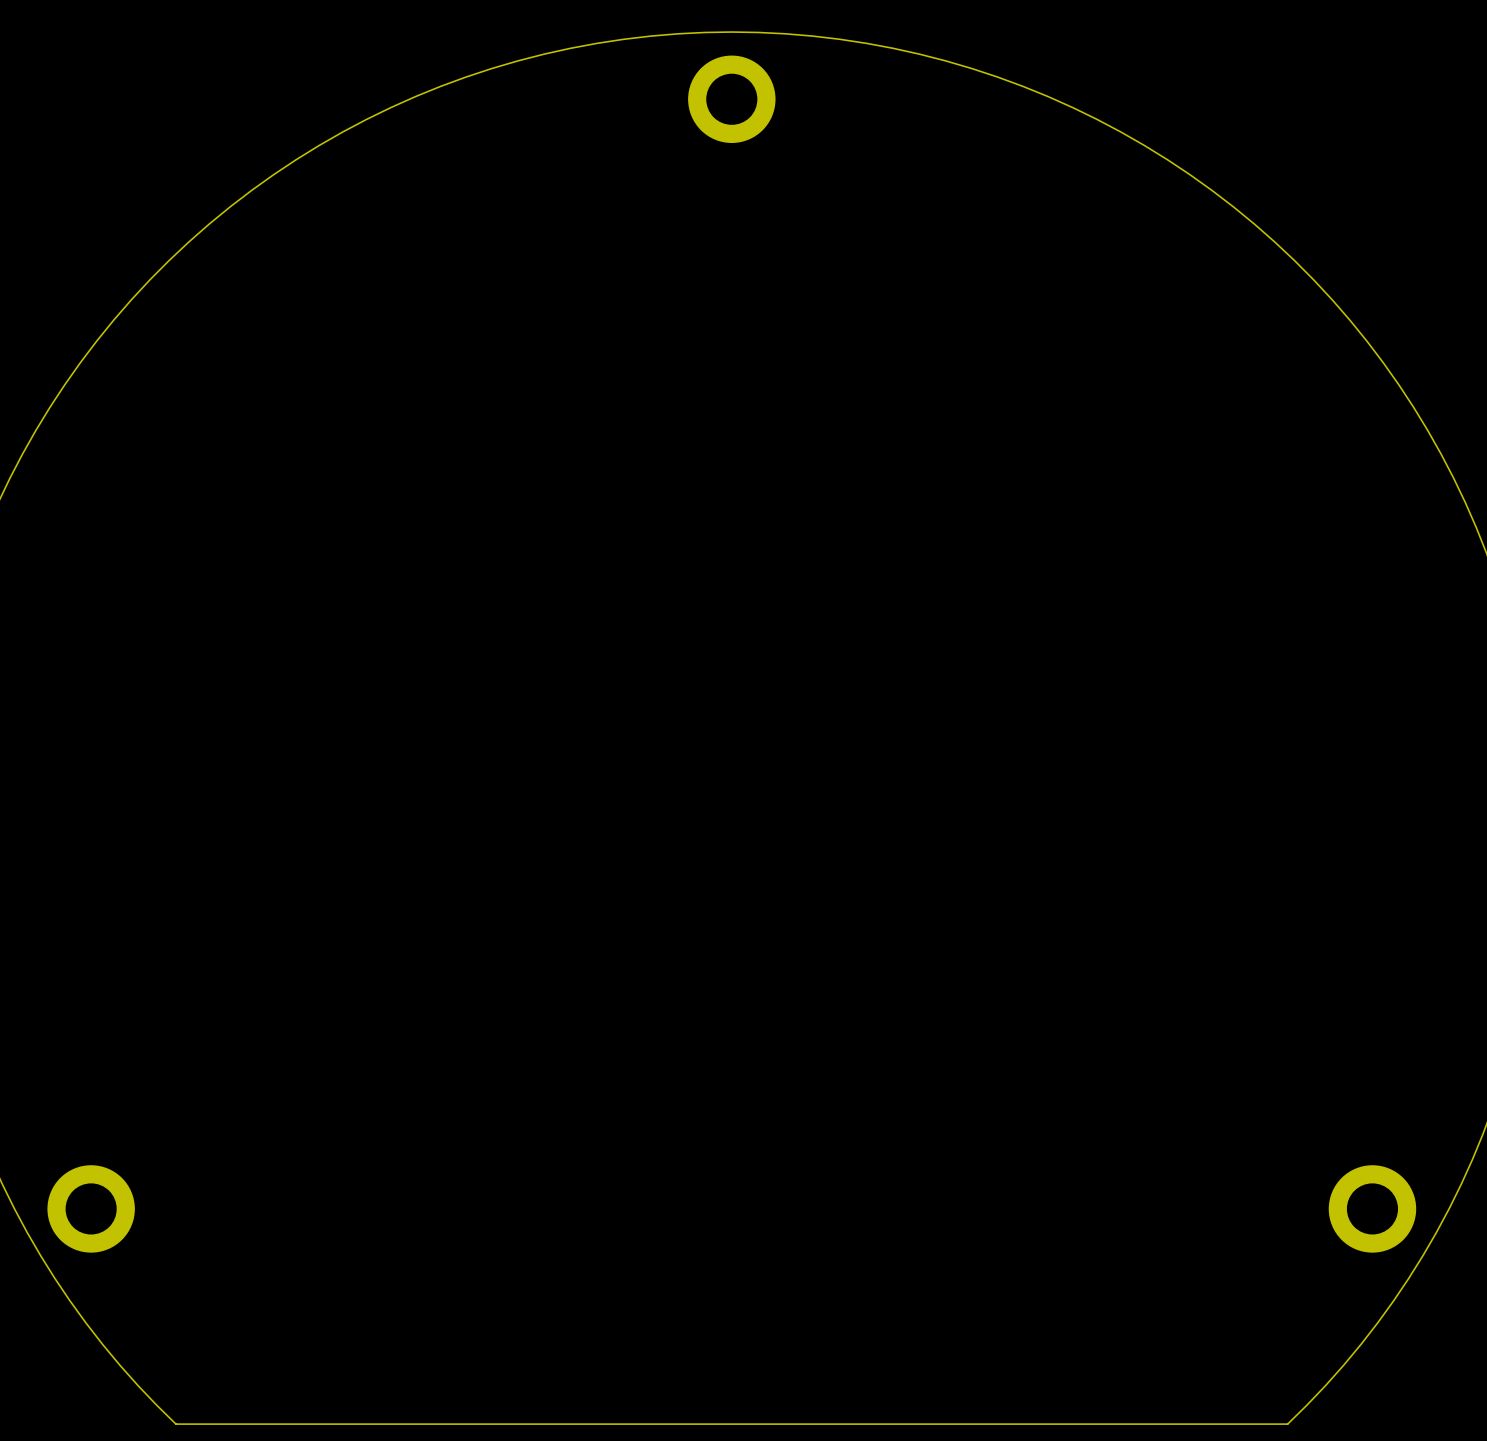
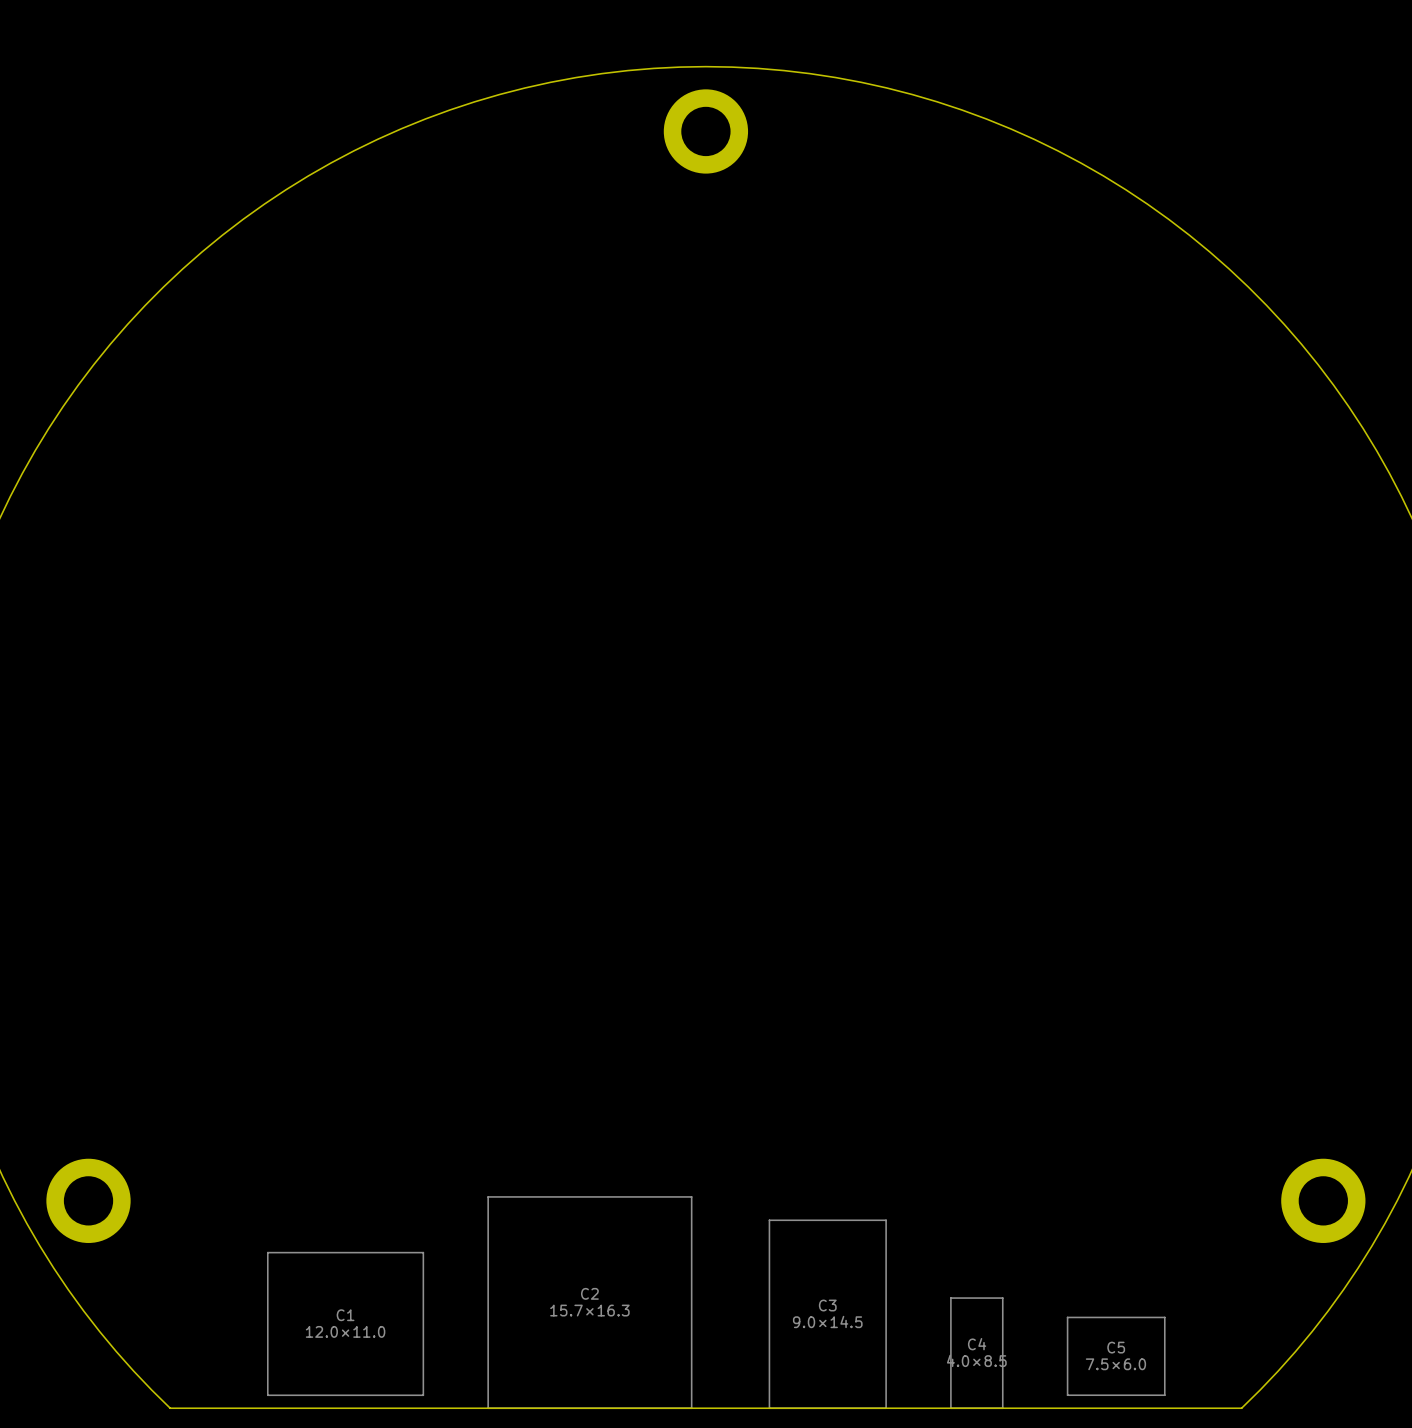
line: none -> (488, 1196) (691, 1196) (691, 1408) (488, 1408) (488, 1196)
line: none -> (769, 1220) (886, 1220) (886, 1408) (769, 1408) (769, 1220)
line: none -> (267, 1252) (423, 1252) (423, 1395) (267, 1395) (267, 1252)
text: none -> C2 (589, 1293)
line: none -> (950, 1298) (1002, 1298) (1002, 1408) (950, 1408) (950, 1298)
text: none -> C3 (827, 1305)
text: none -> 15.7×16.3 (589, 1310)
text: none -> C1 (345, 1315)
line: none -> (1067, 1317) (1164, 1317) (1164, 1395) (1067, 1395) (1067, 1317)
text: none -> 9.0×14.5 (827, 1321)
text: none -> 12.0×11.0 (345, 1331)
text: none -> C4 (977, 1344)
text: none -> C5 (1116, 1347)
text: none -> 4.0×8.5 (976, 1360)
text: none -> 7.5×6.0 (1115, 1364)

